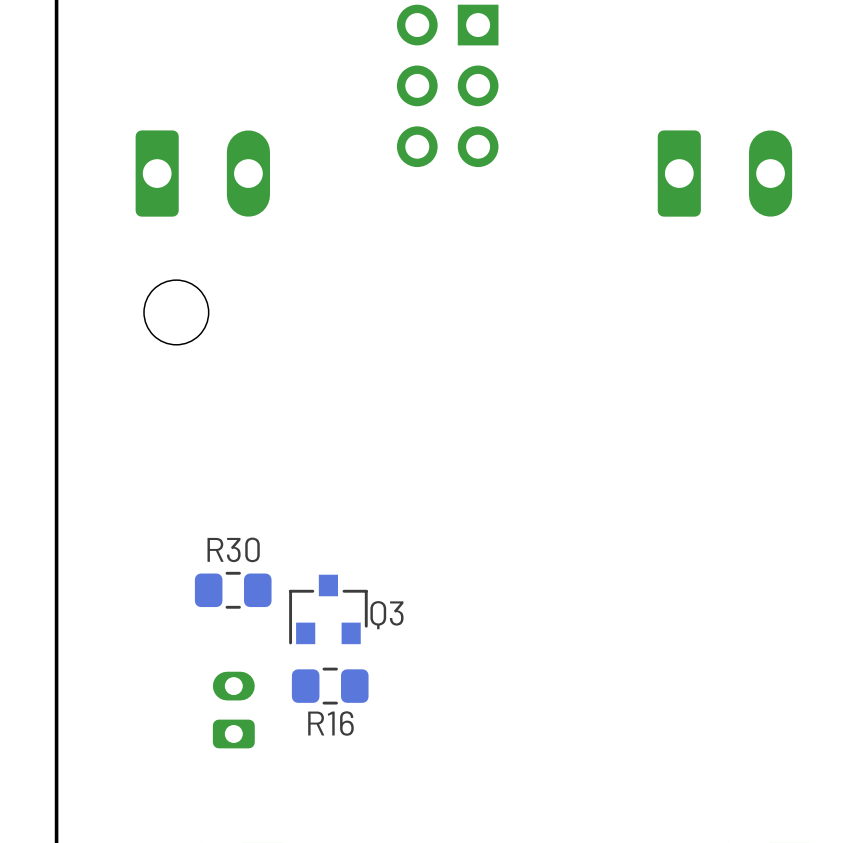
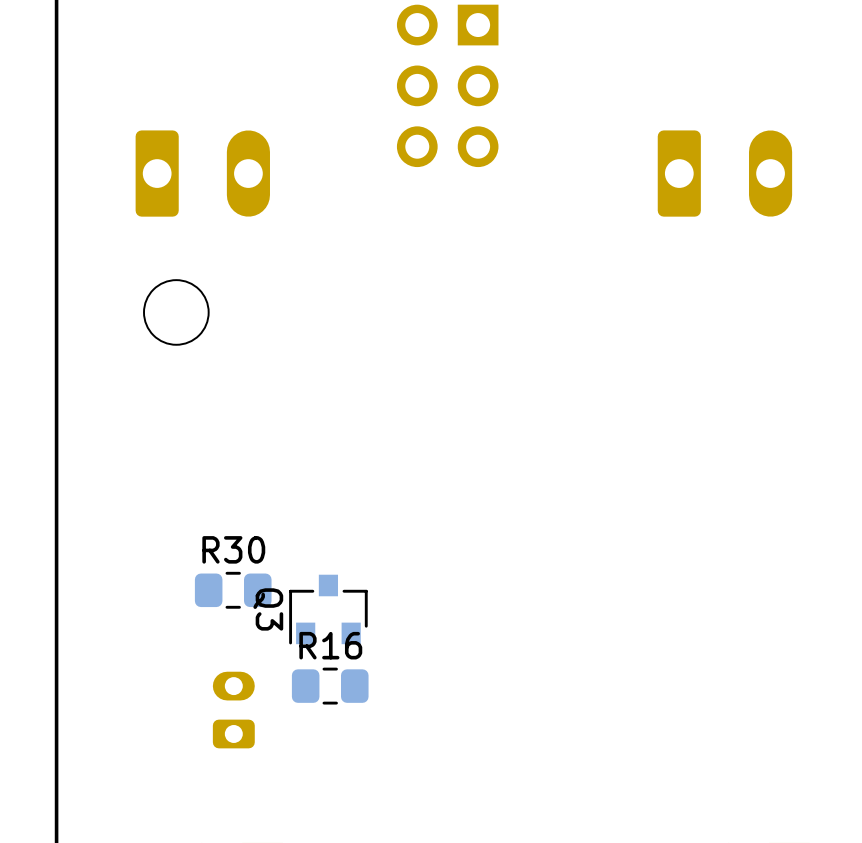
Q3 name rotation: 0° (386, 615) -> 90° clockwise (268, 609)
Q3 name position: Q3 (386, 615) -> Q3 (268, 609)
R16 name position: R16 (330, 723) -> R16 (330, 645)

